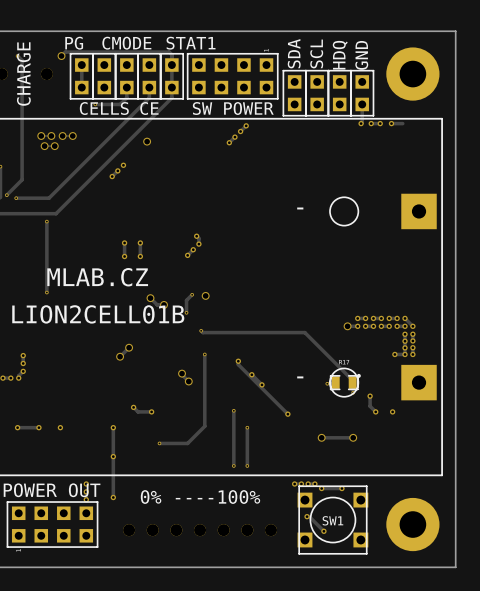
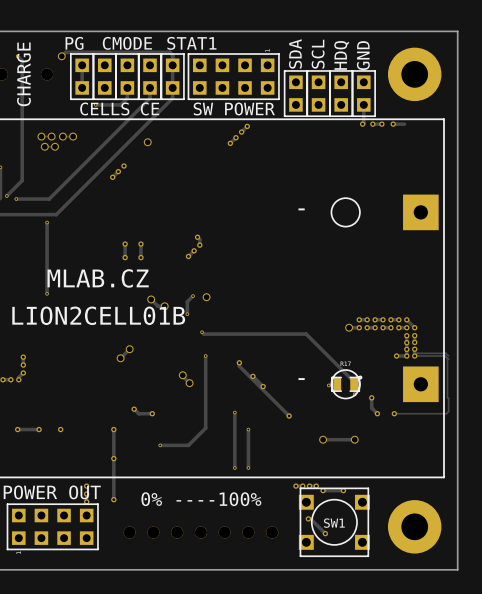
track: none -> (448, 356) (445, 353) (417, 353) (414, 356) (445, 356) (448, 359)
track: none -> (447, 358) (448, 411) (446, 413) (394, 413)

